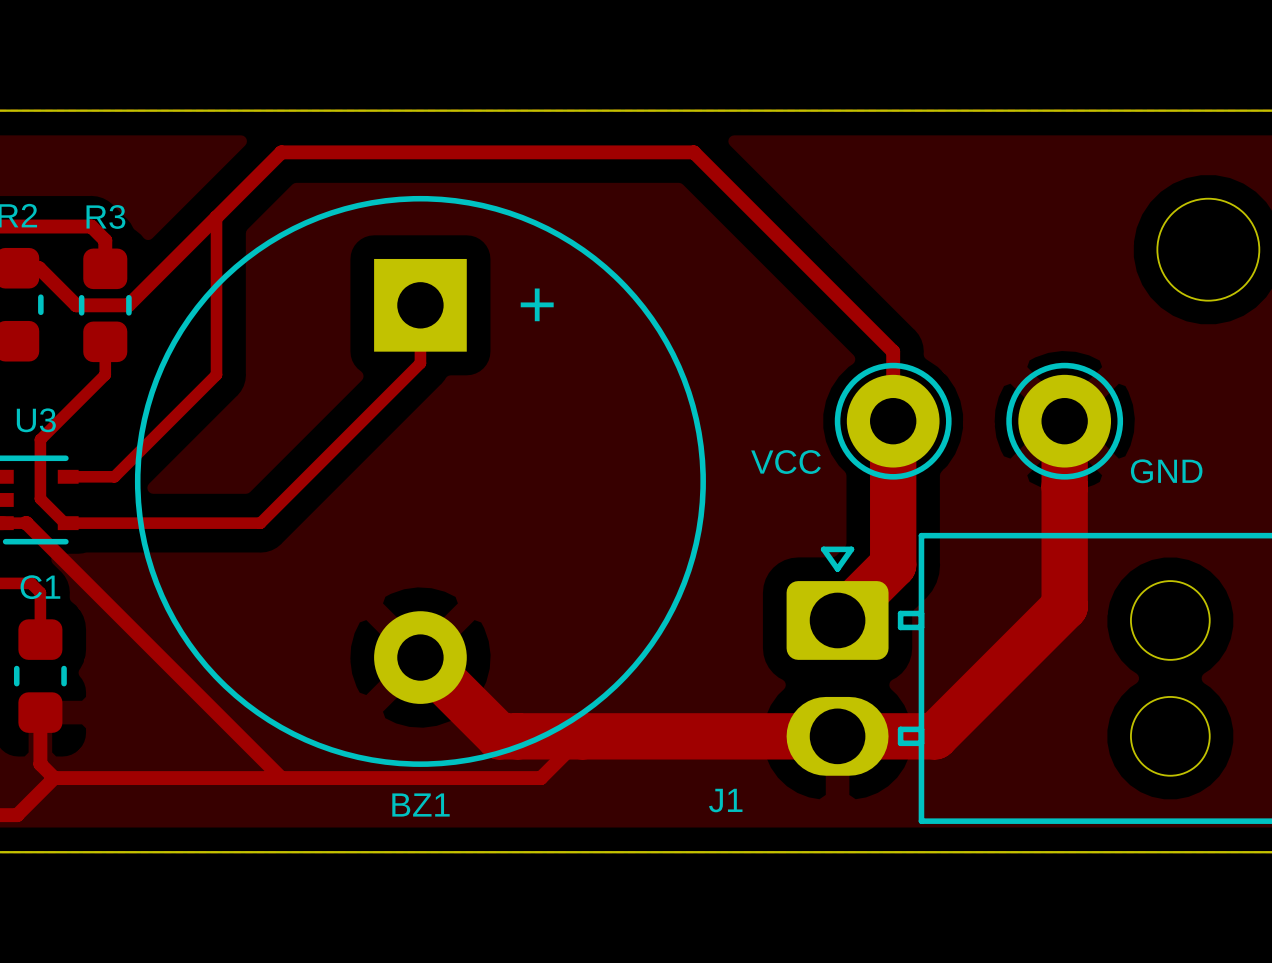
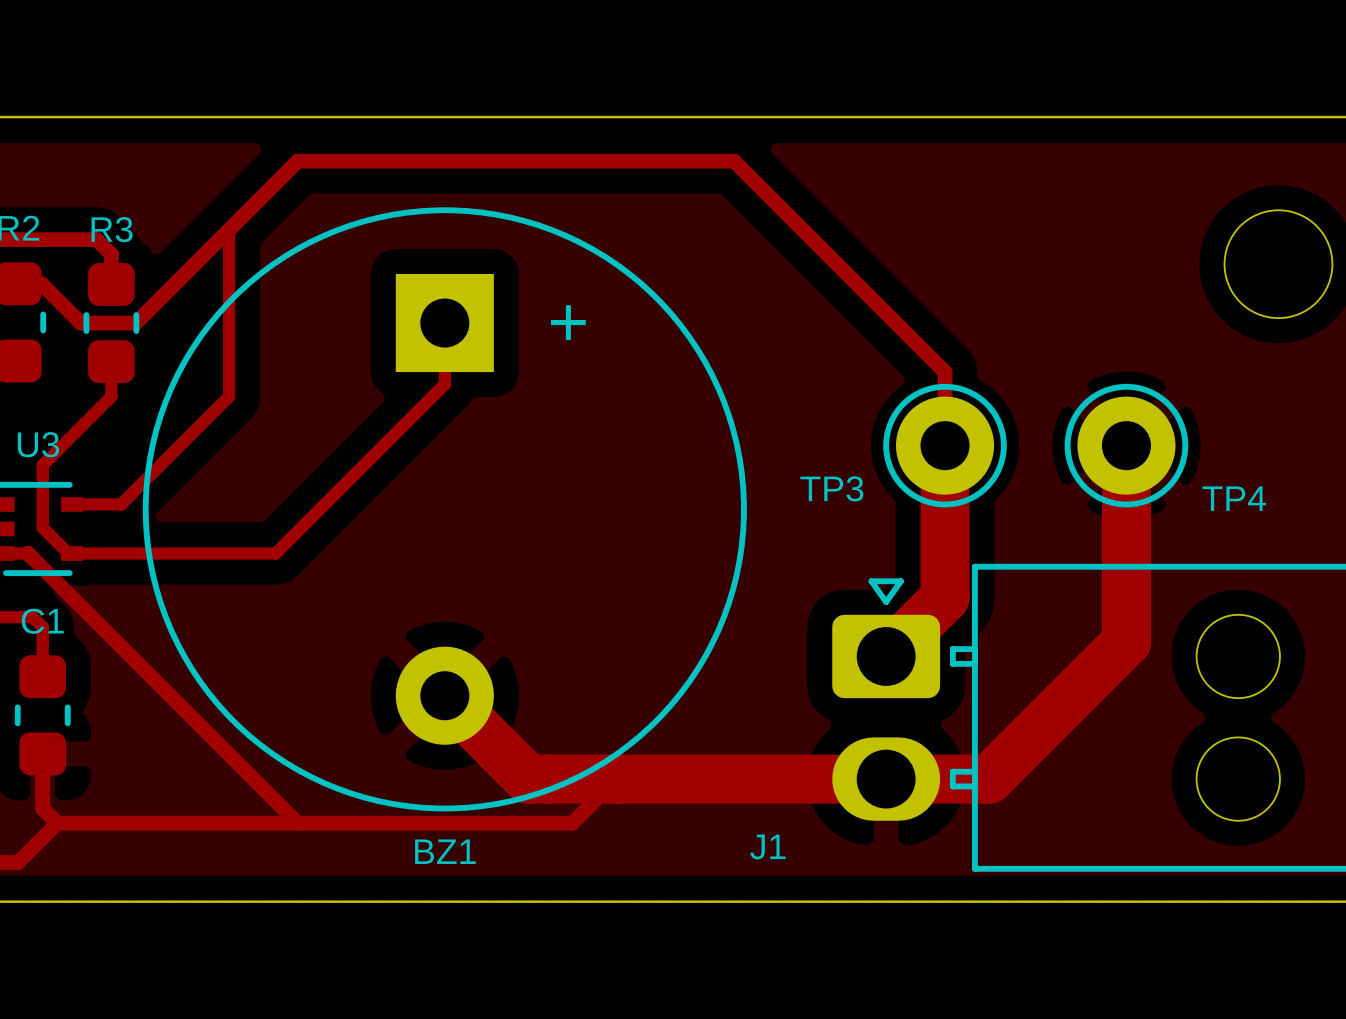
VCC name: VCC (786, 462) -> TP3 (831, 488)
GND name: GND (1166, 471) -> TP4 (1234, 498)

